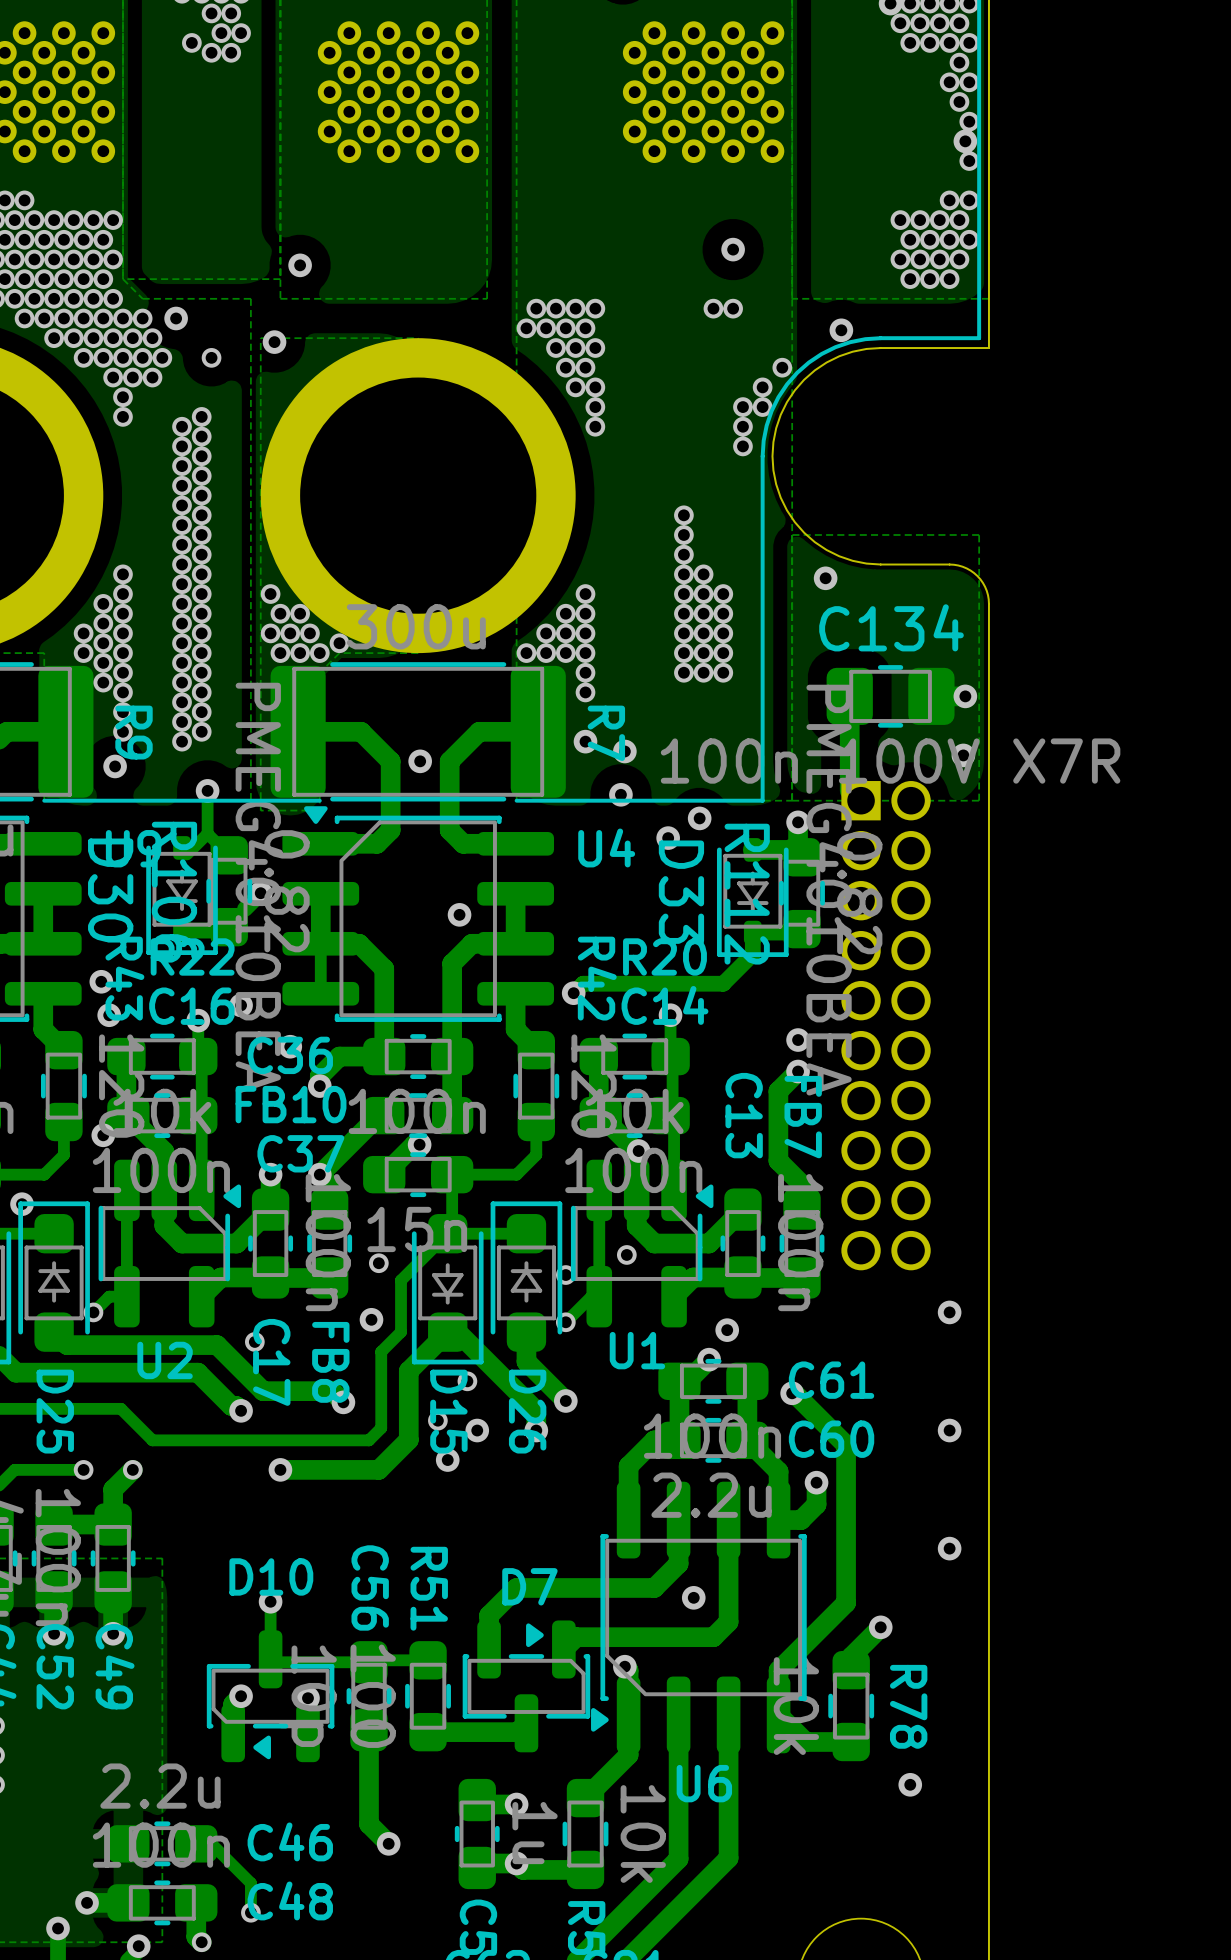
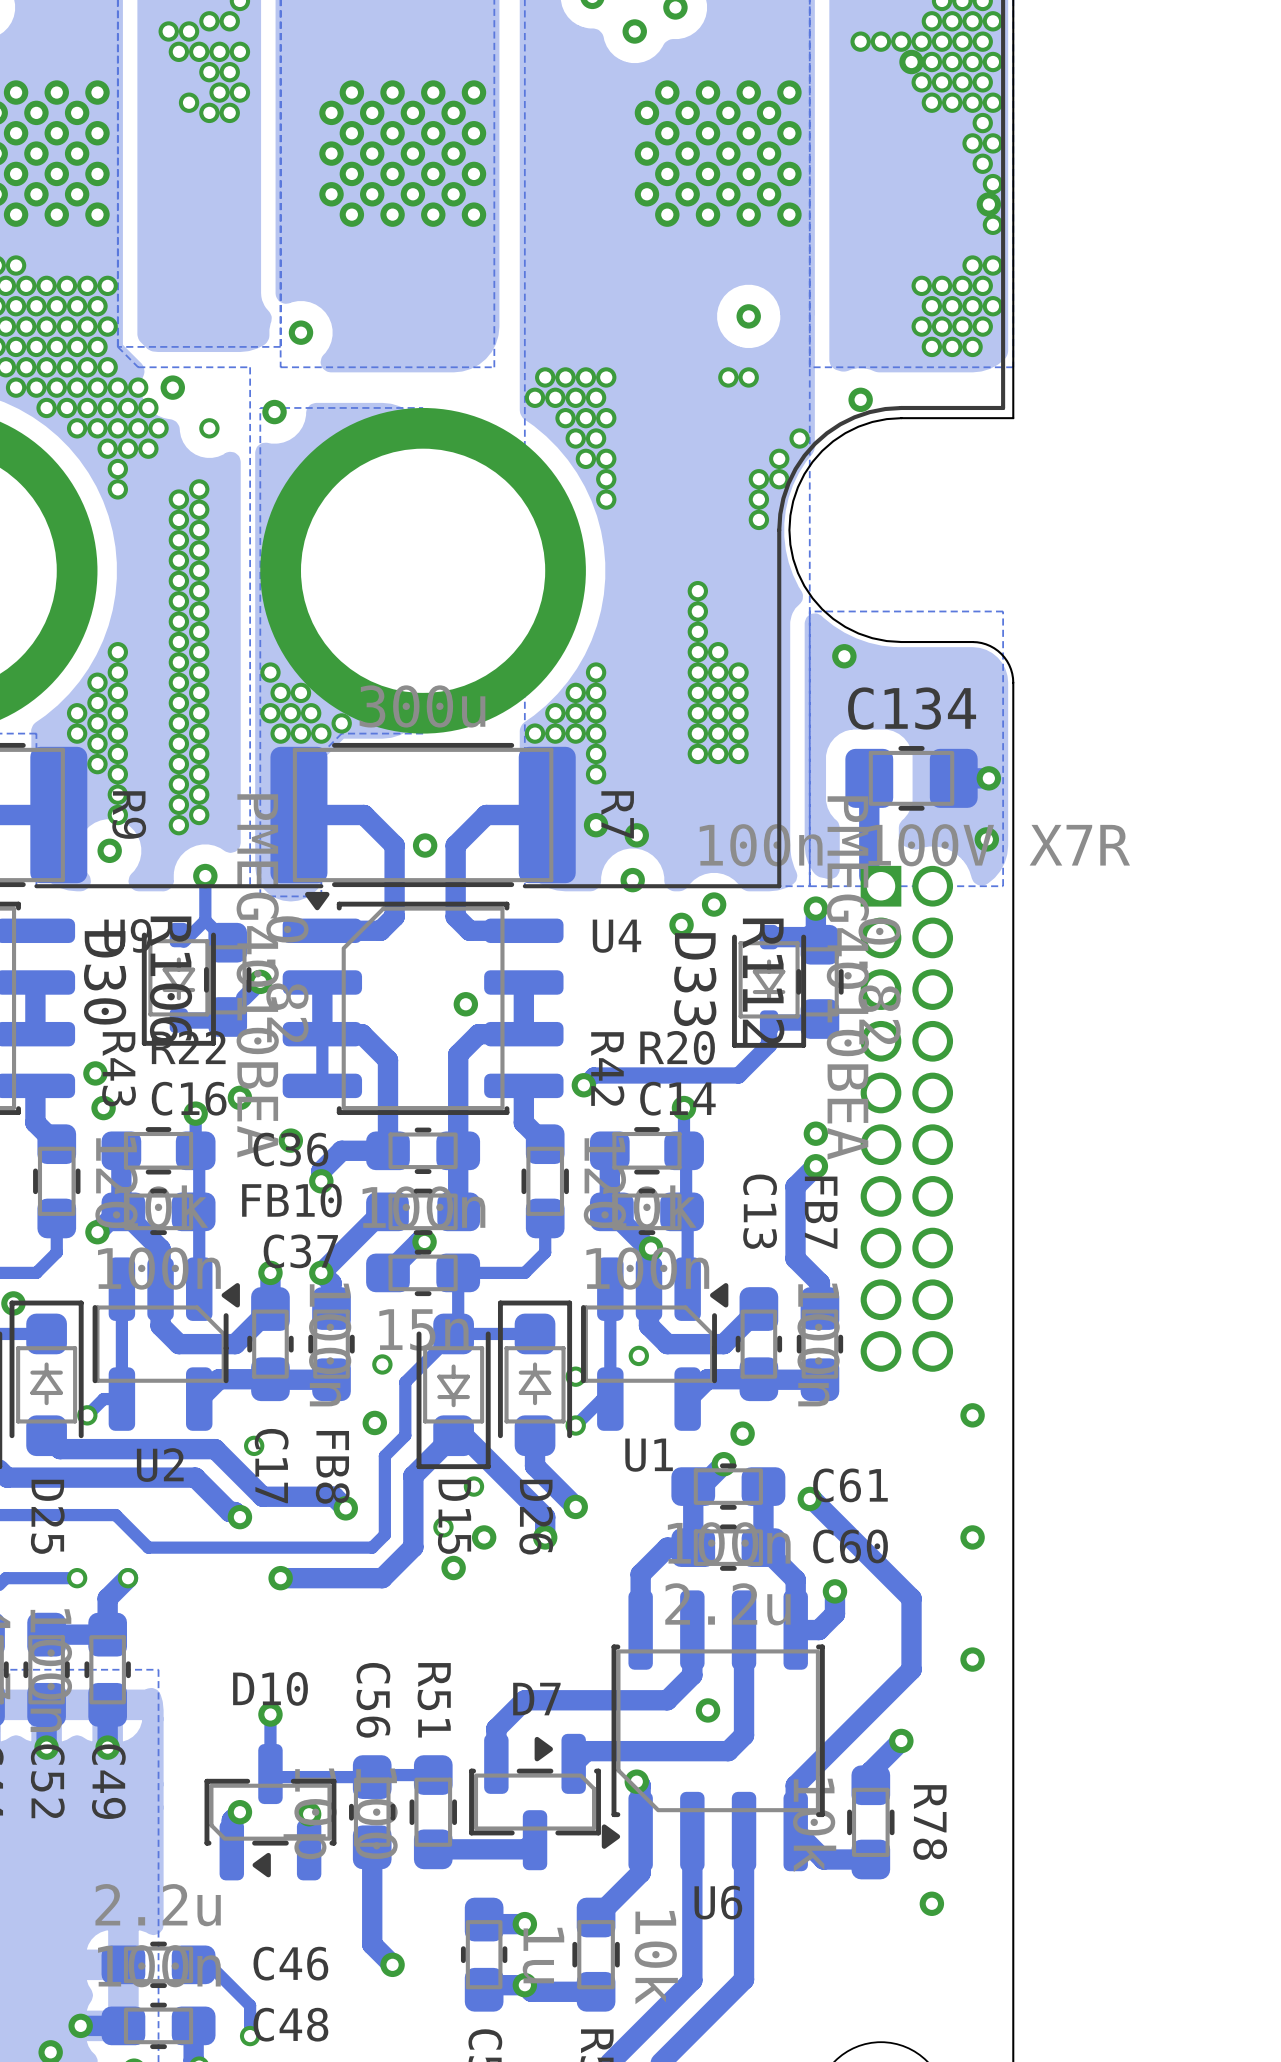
track: (846, 1445) (846, 1602) -> (865, 1552) (911, 1598) (911, 1669) (865, 1715)

